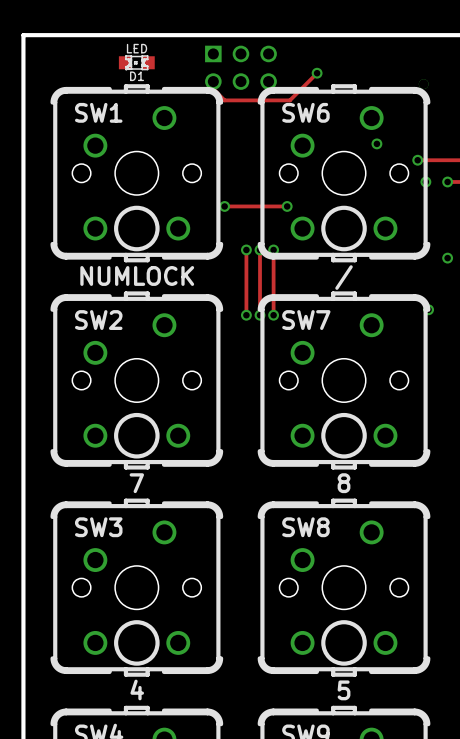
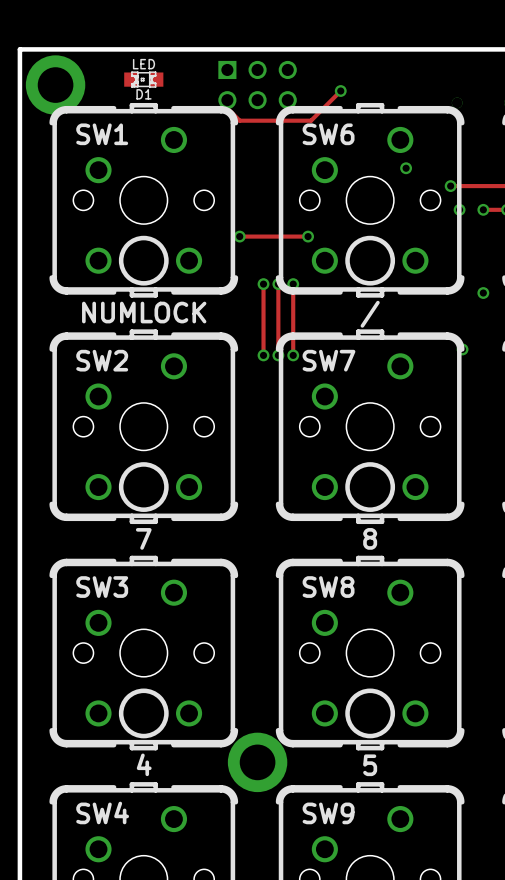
part: none -> (55, 85)
part: none -> (257, 762)

